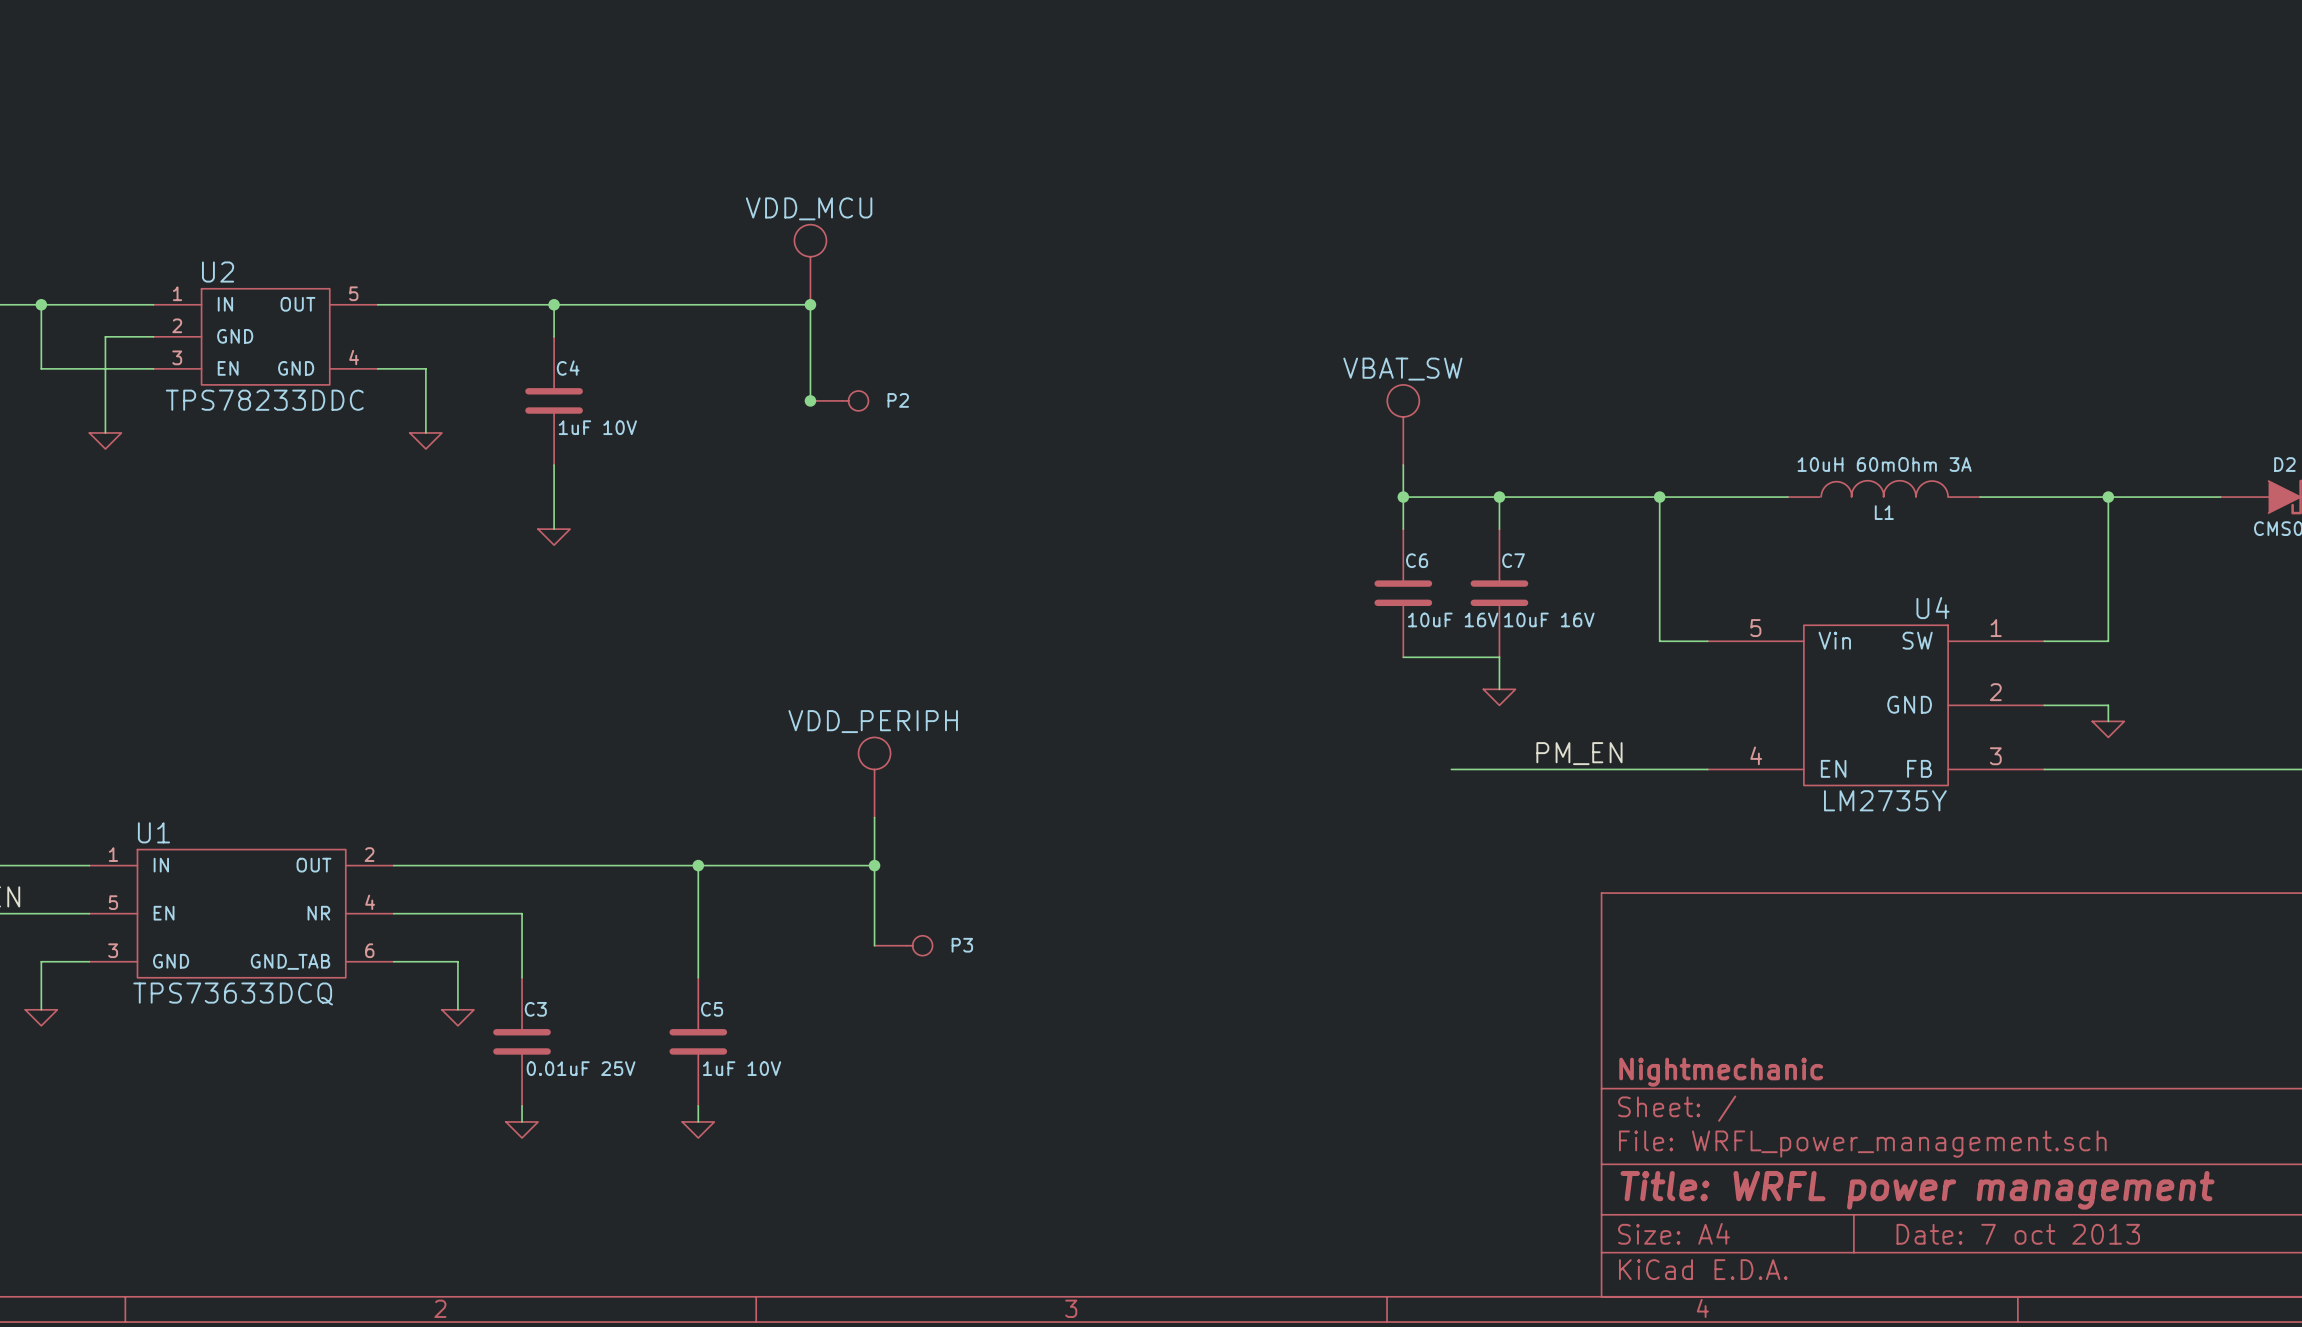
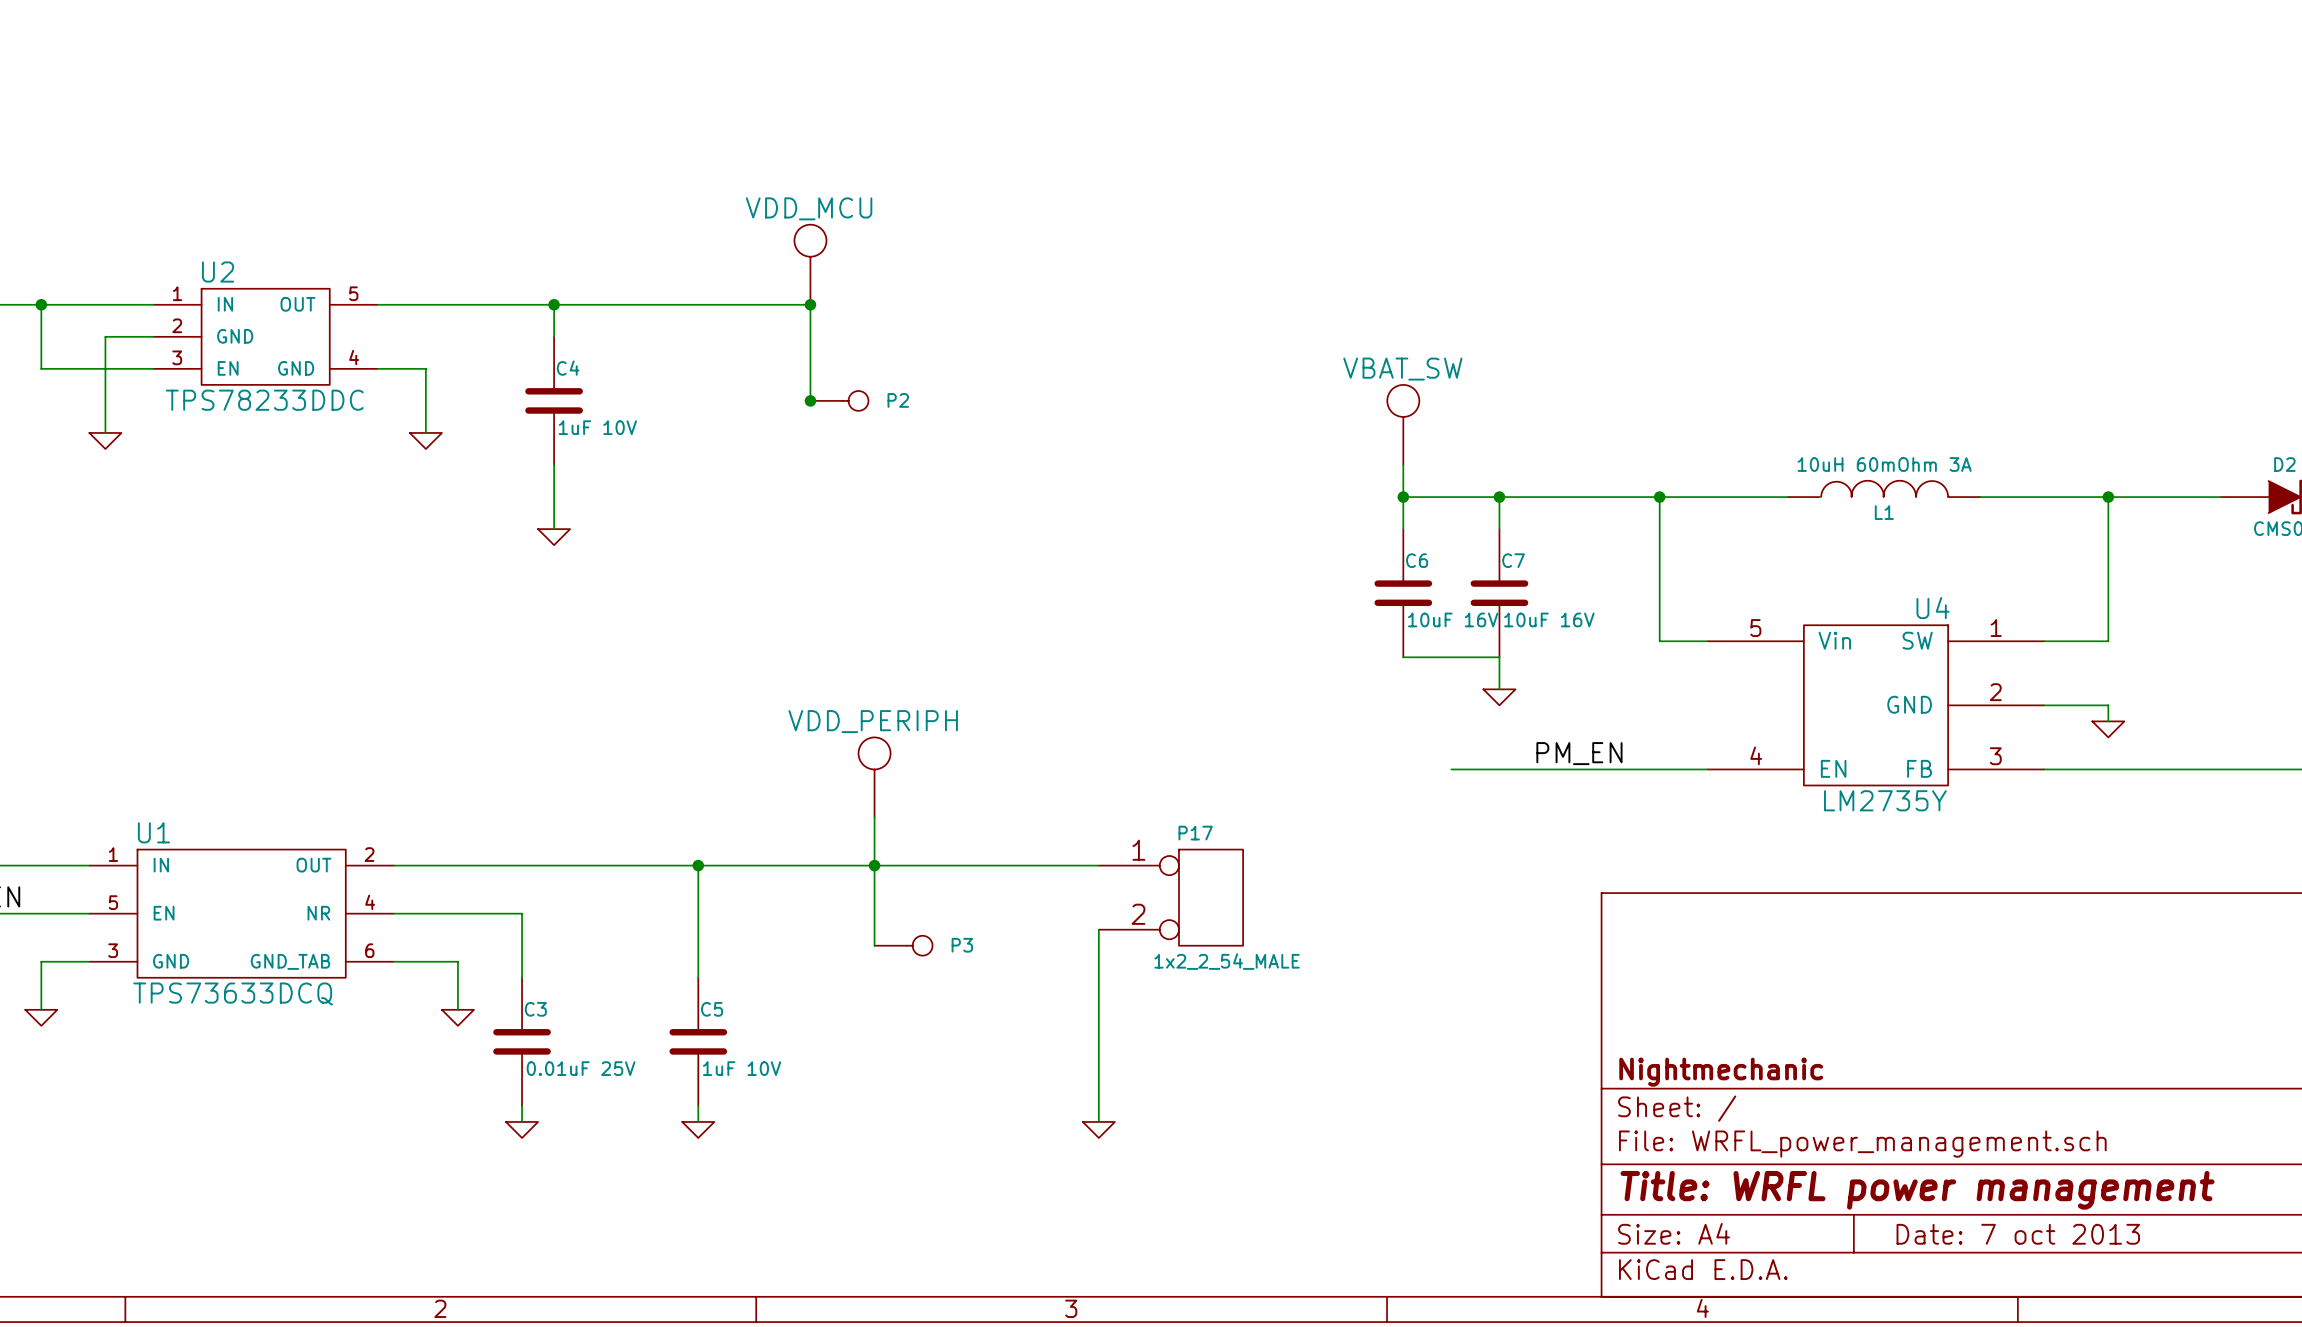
wire: none -> (874, 865) (1098, 865)
P17: none -> 1x2_2_54_MALE (1170, 897)
wire: none -> (1098, 929) (1098, 1121)
power symbol: none -> (1098, 1129)

